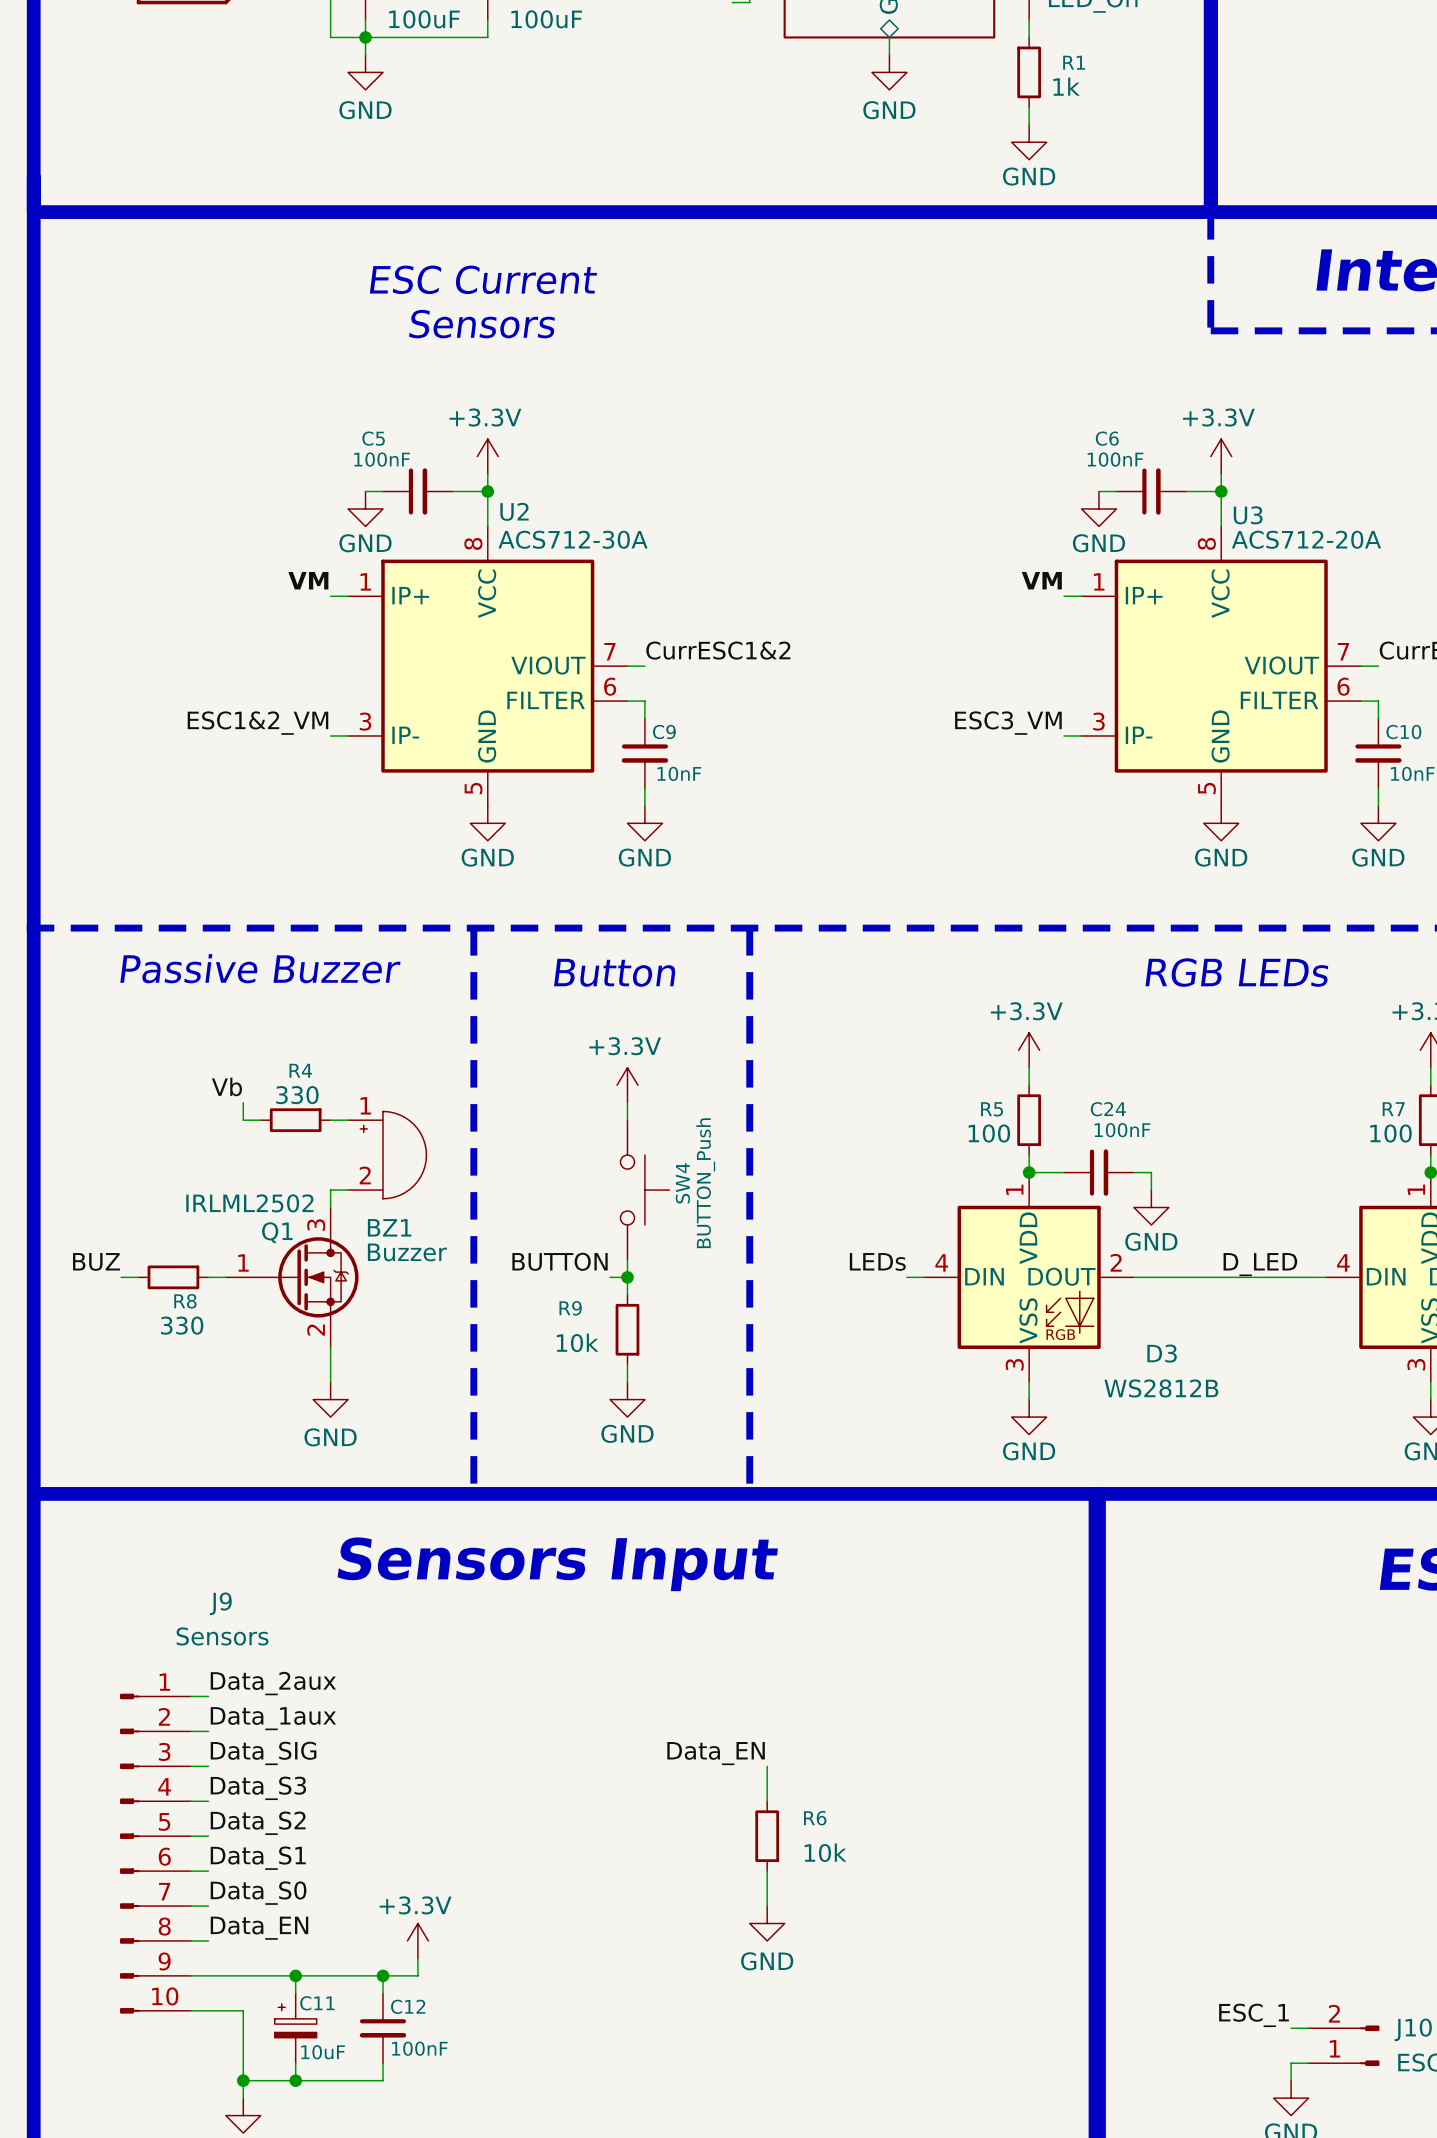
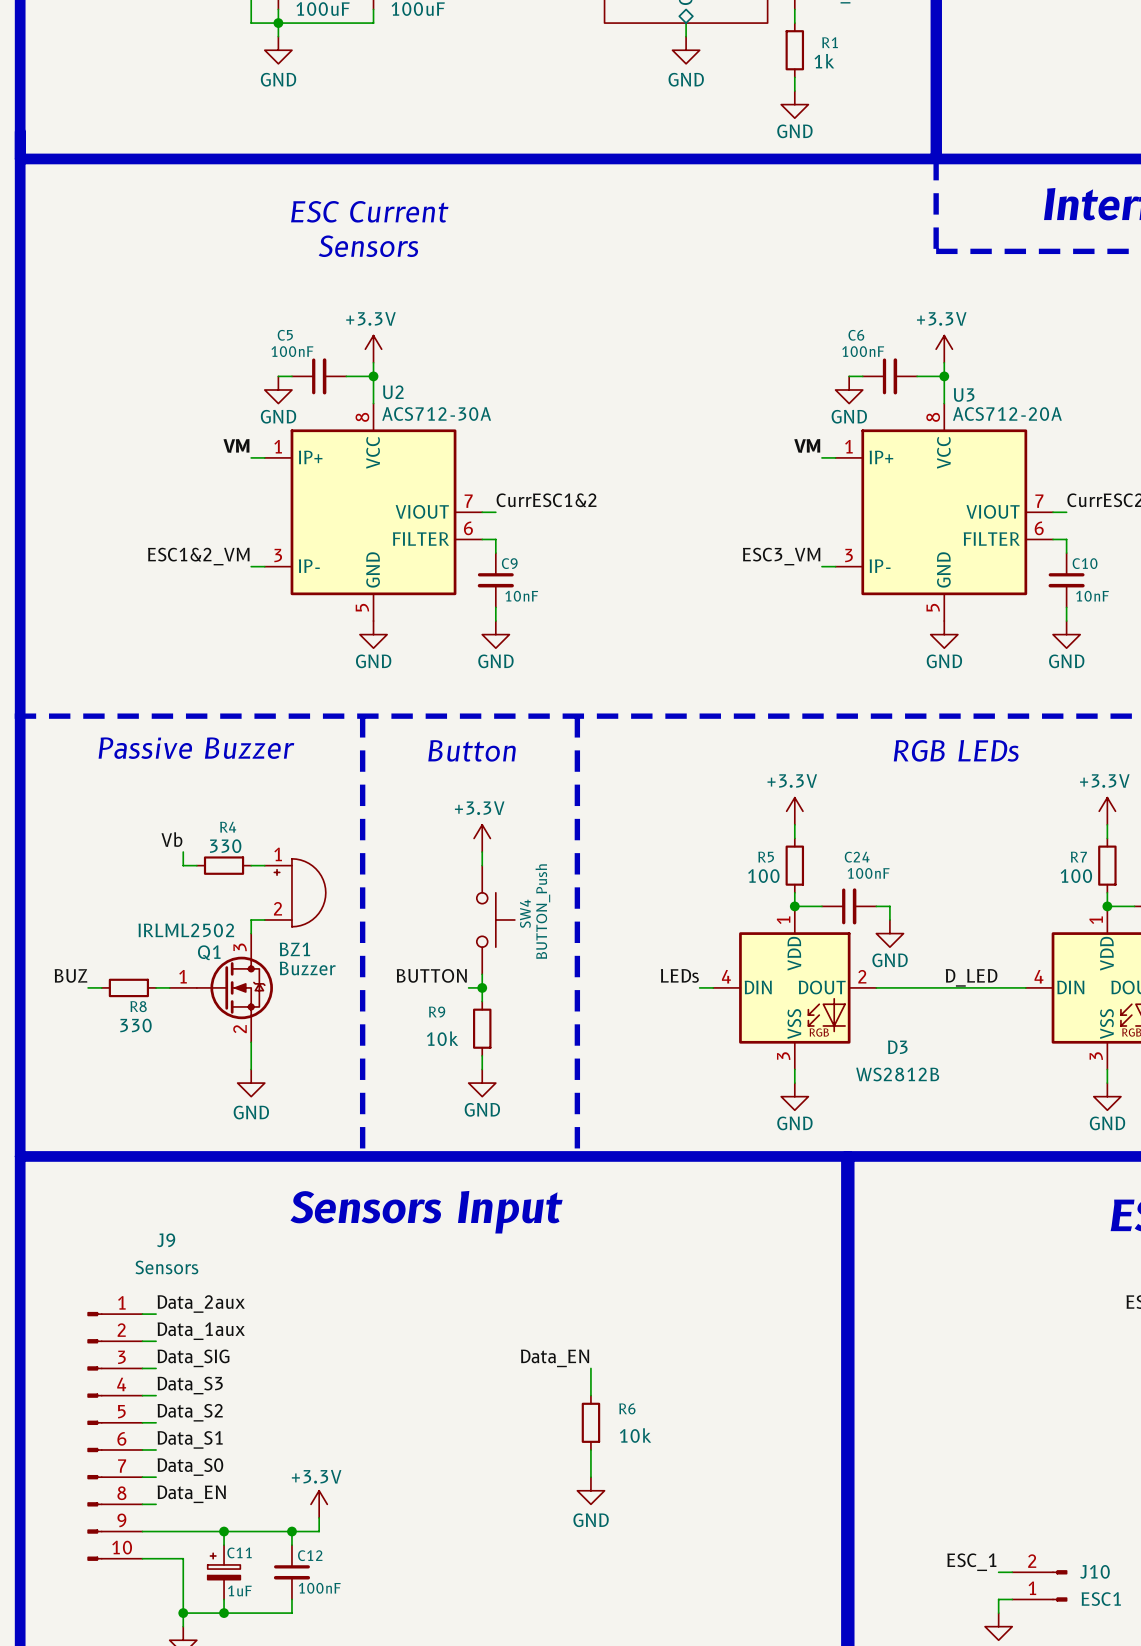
C11 value: 10uF (323, 2052) -> 1uF (239, 1590)

